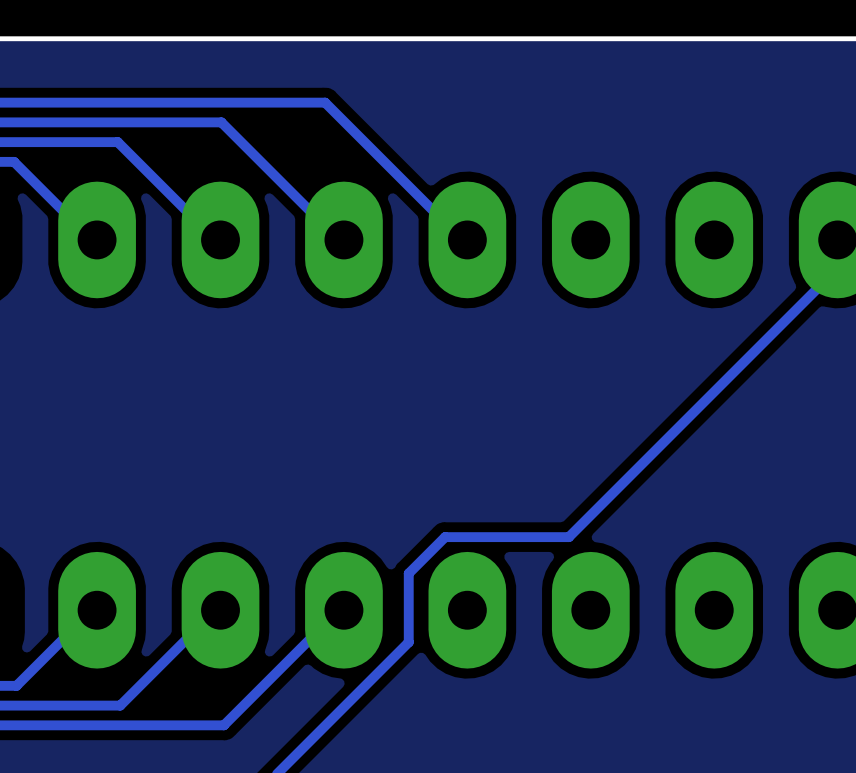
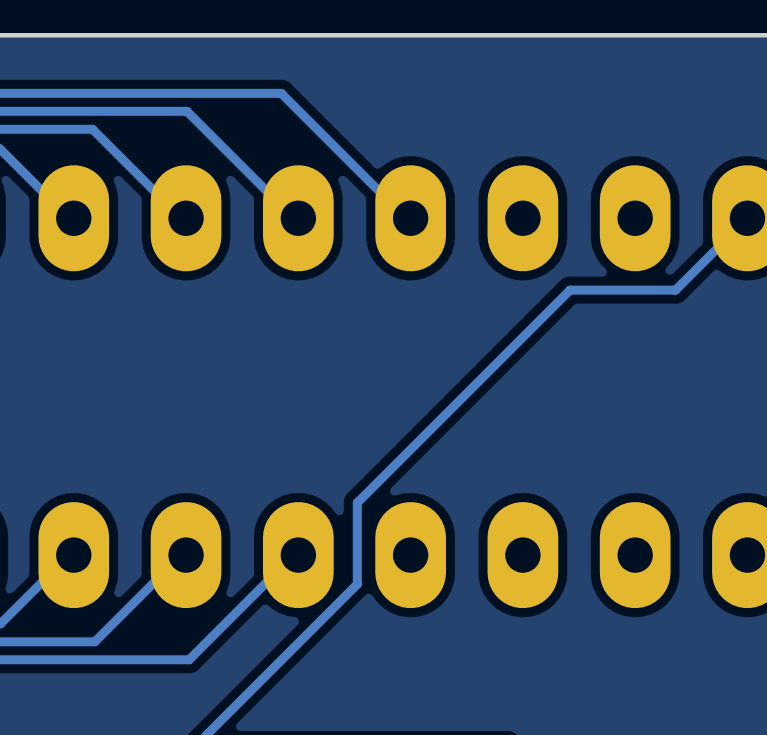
track: (837, 239) (837, 268) (568, 537) (445, 537) (408, 573) -> (747, 218) (675, 290) (570, 290) (357, 502) (357, 521)

